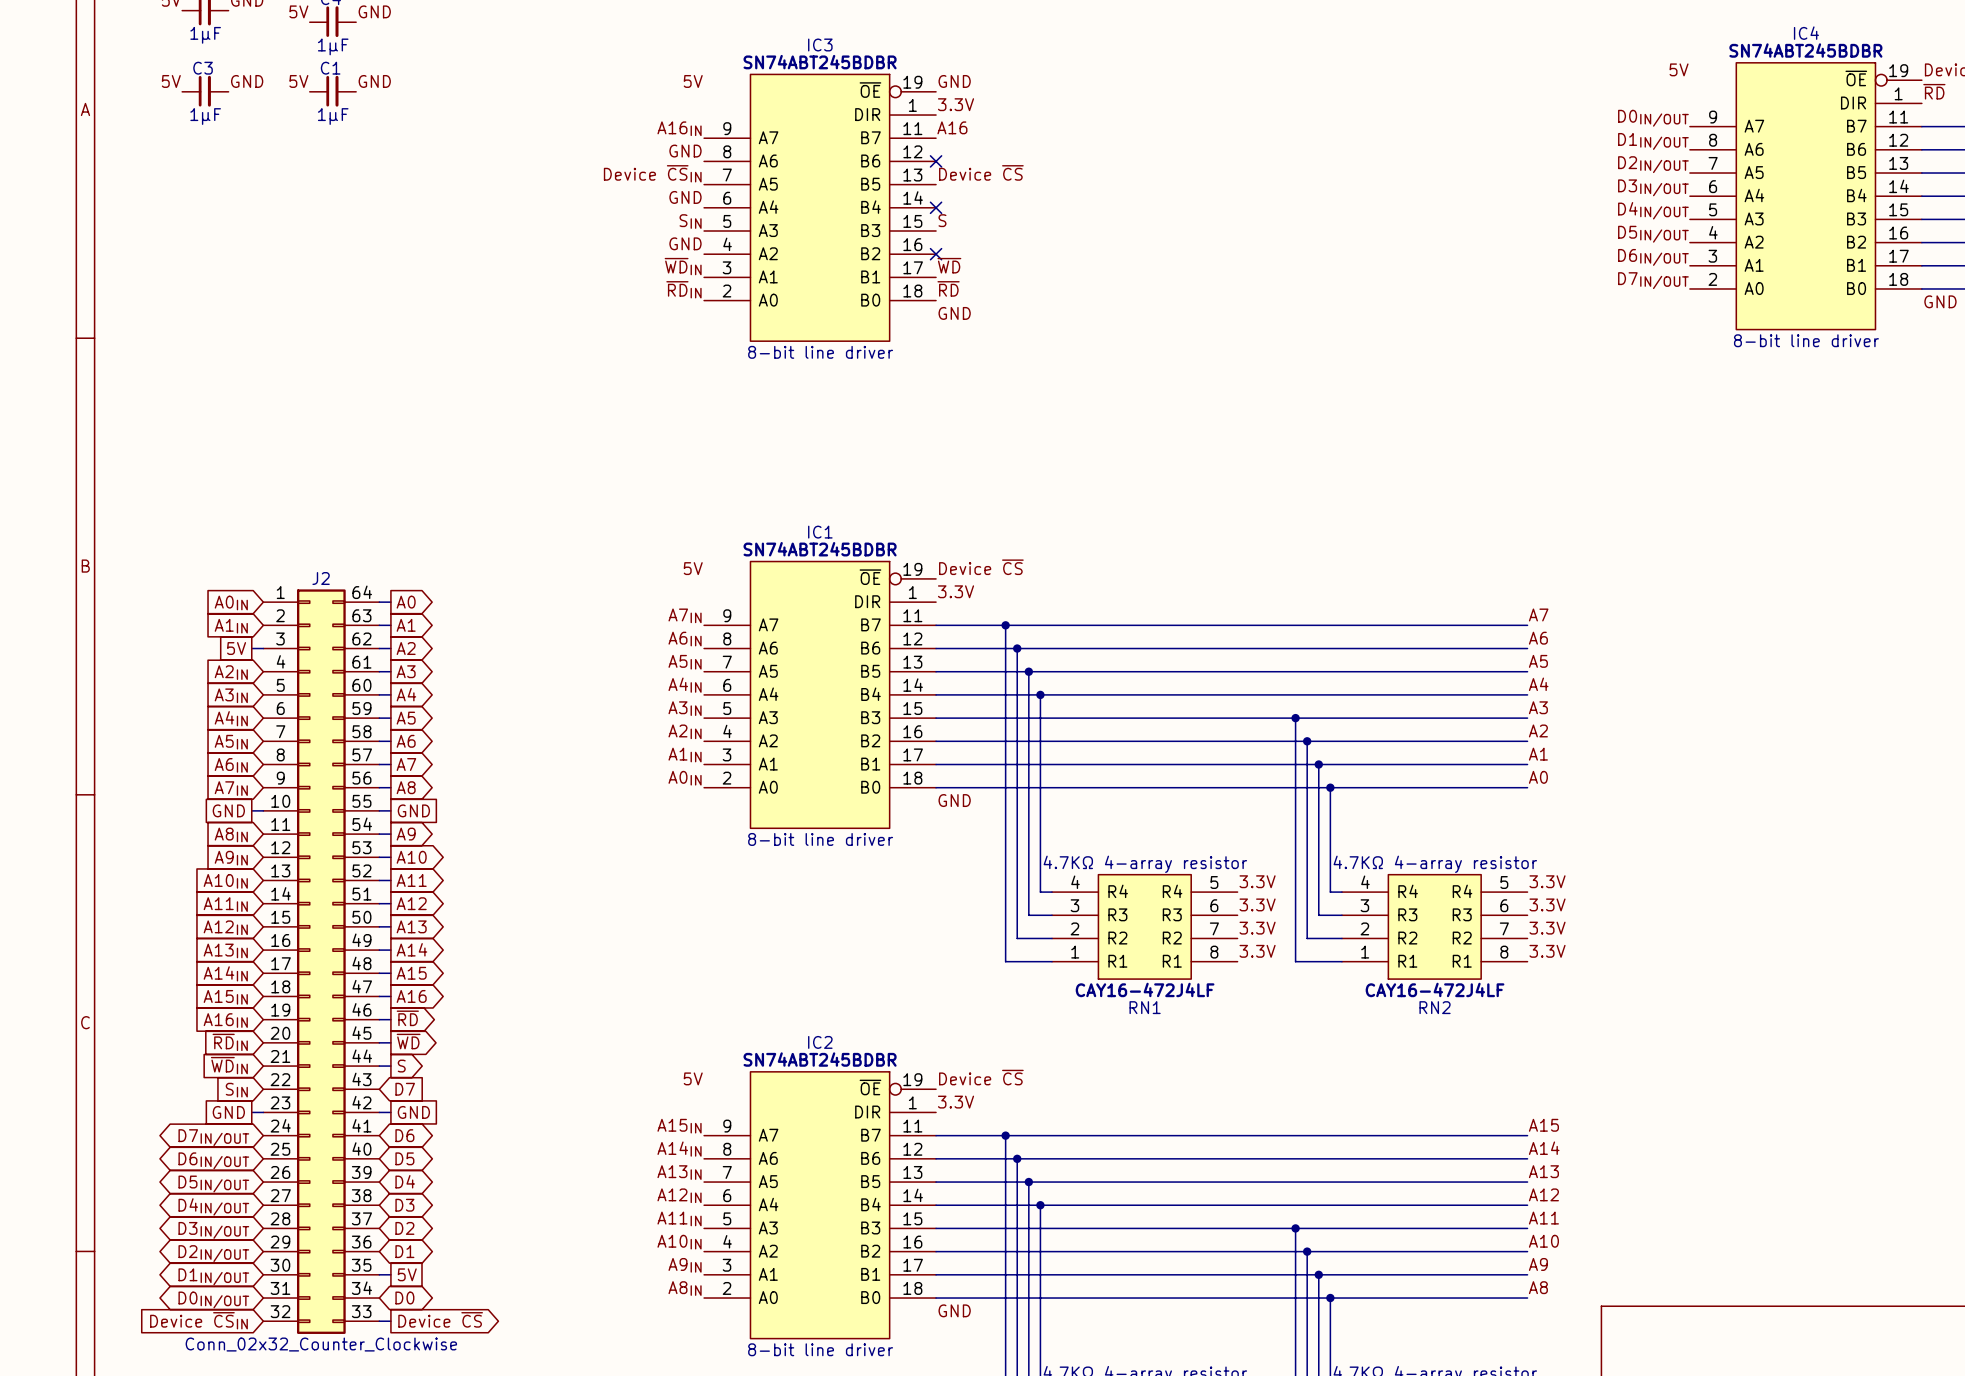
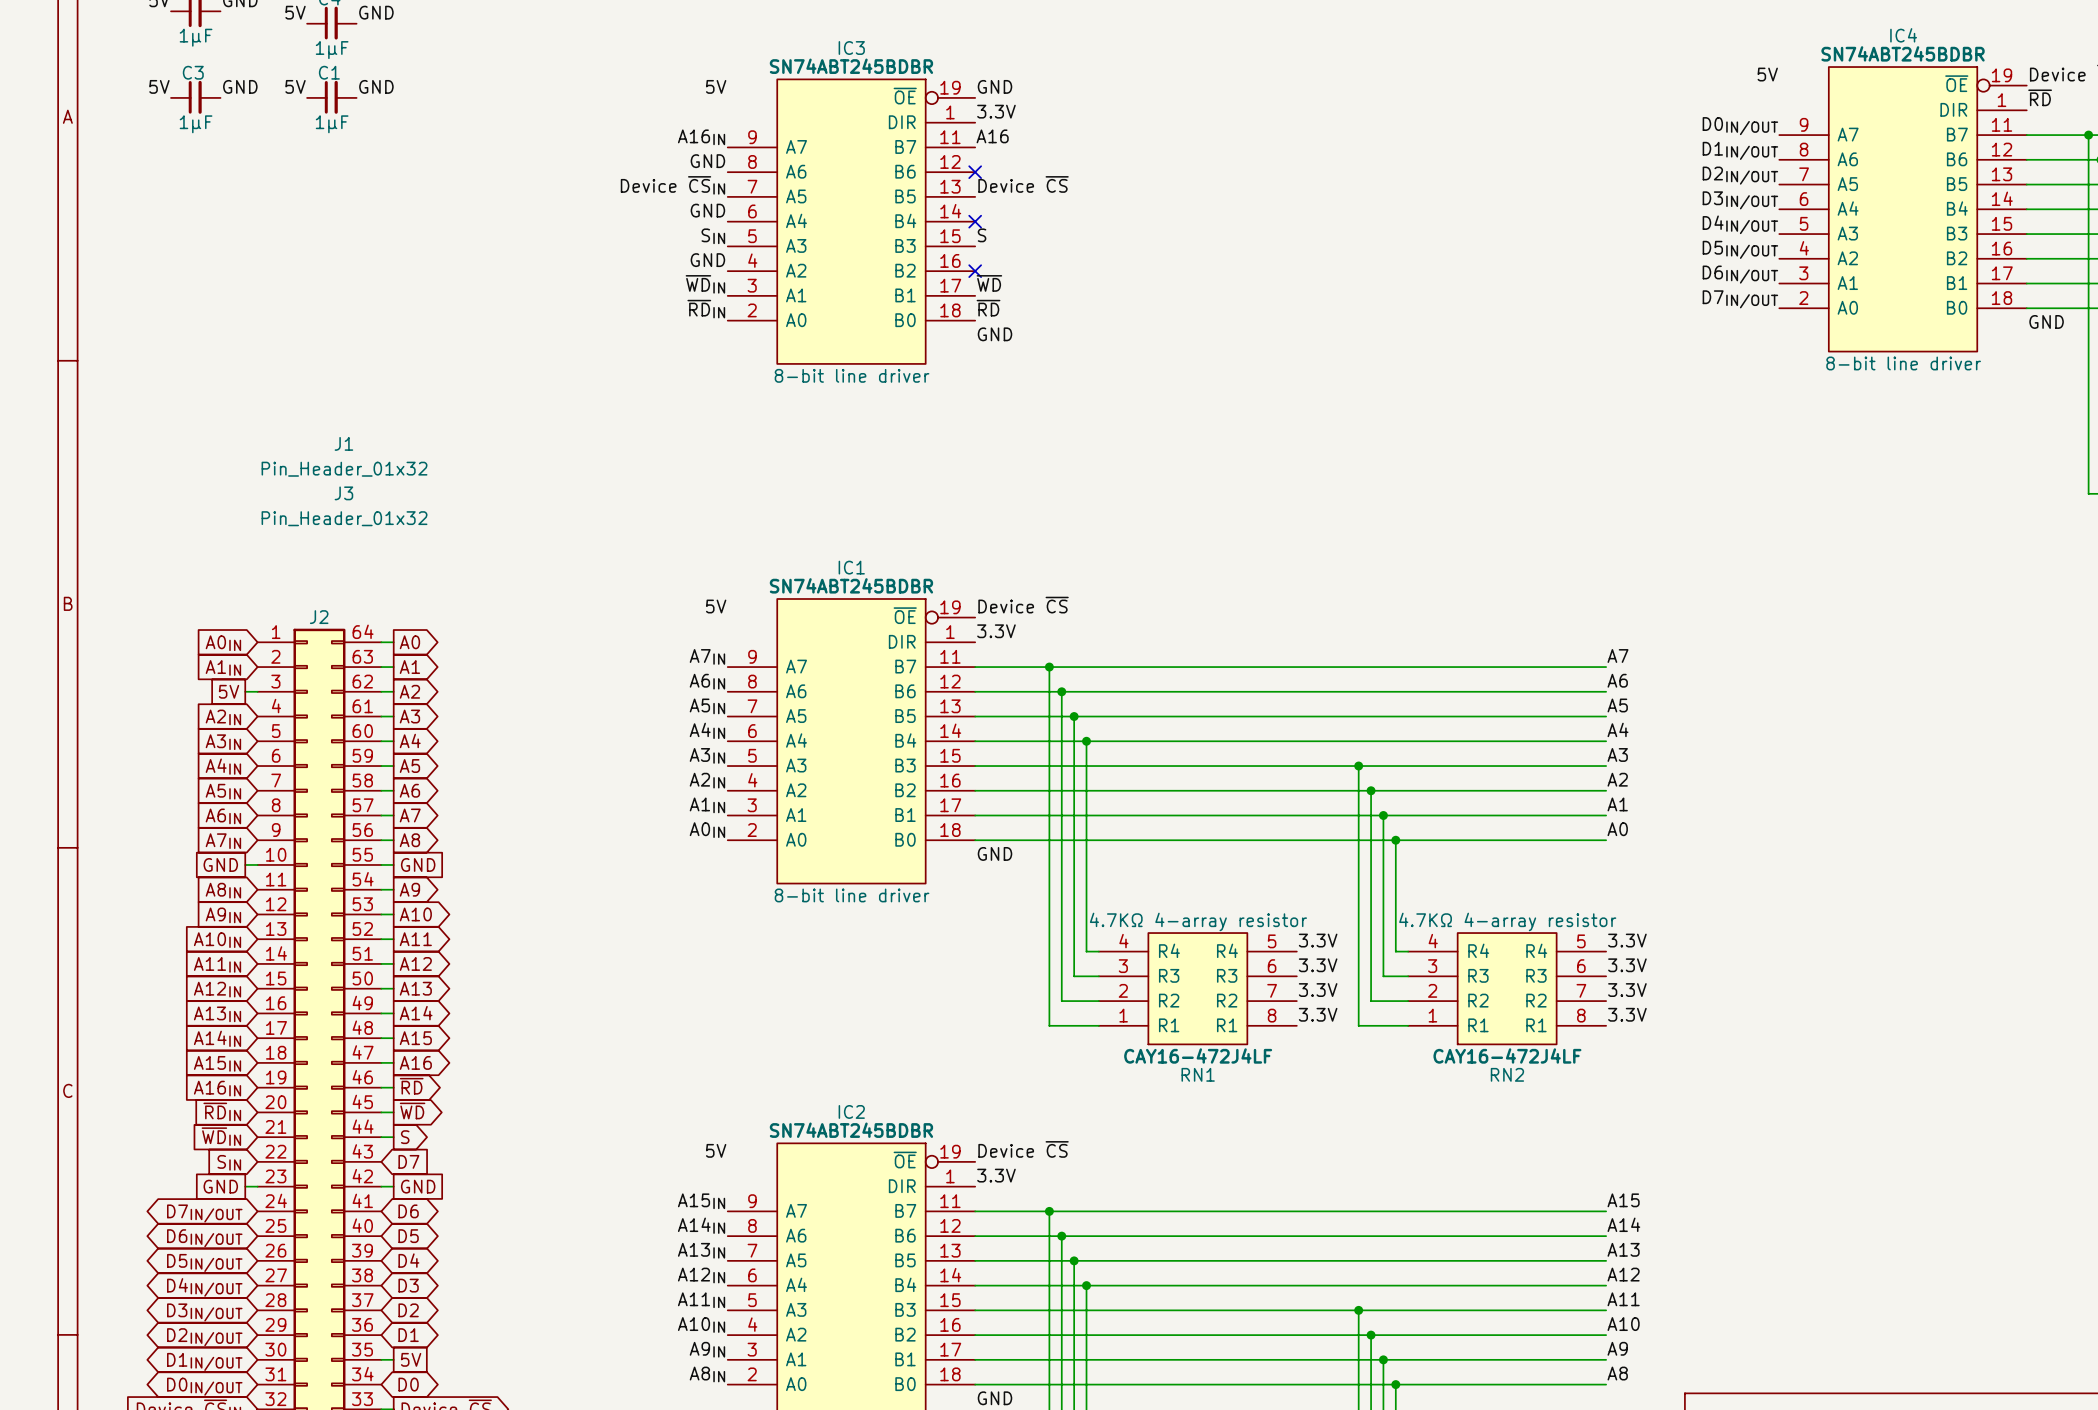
J1: none -> Pin_Header_01x32 (344, 456)
J3: none -> Pin_Header_01x32 (344, 506)

